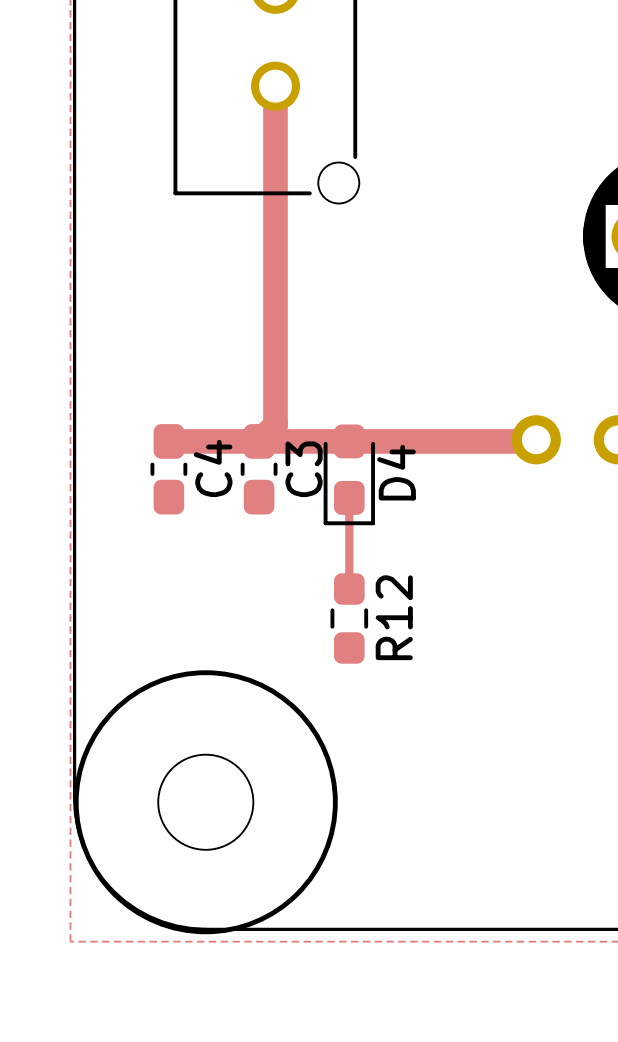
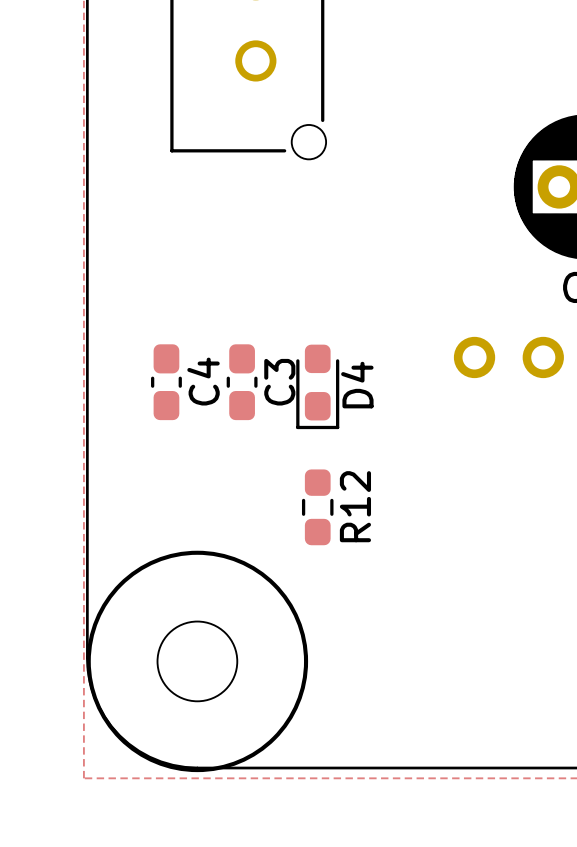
track: (275, 86) (275, 425) (259, 441) -> none
track: (536, 439) (534, 441) (168, 441) -> none
track: (349, 497) (349, 589) -> none

